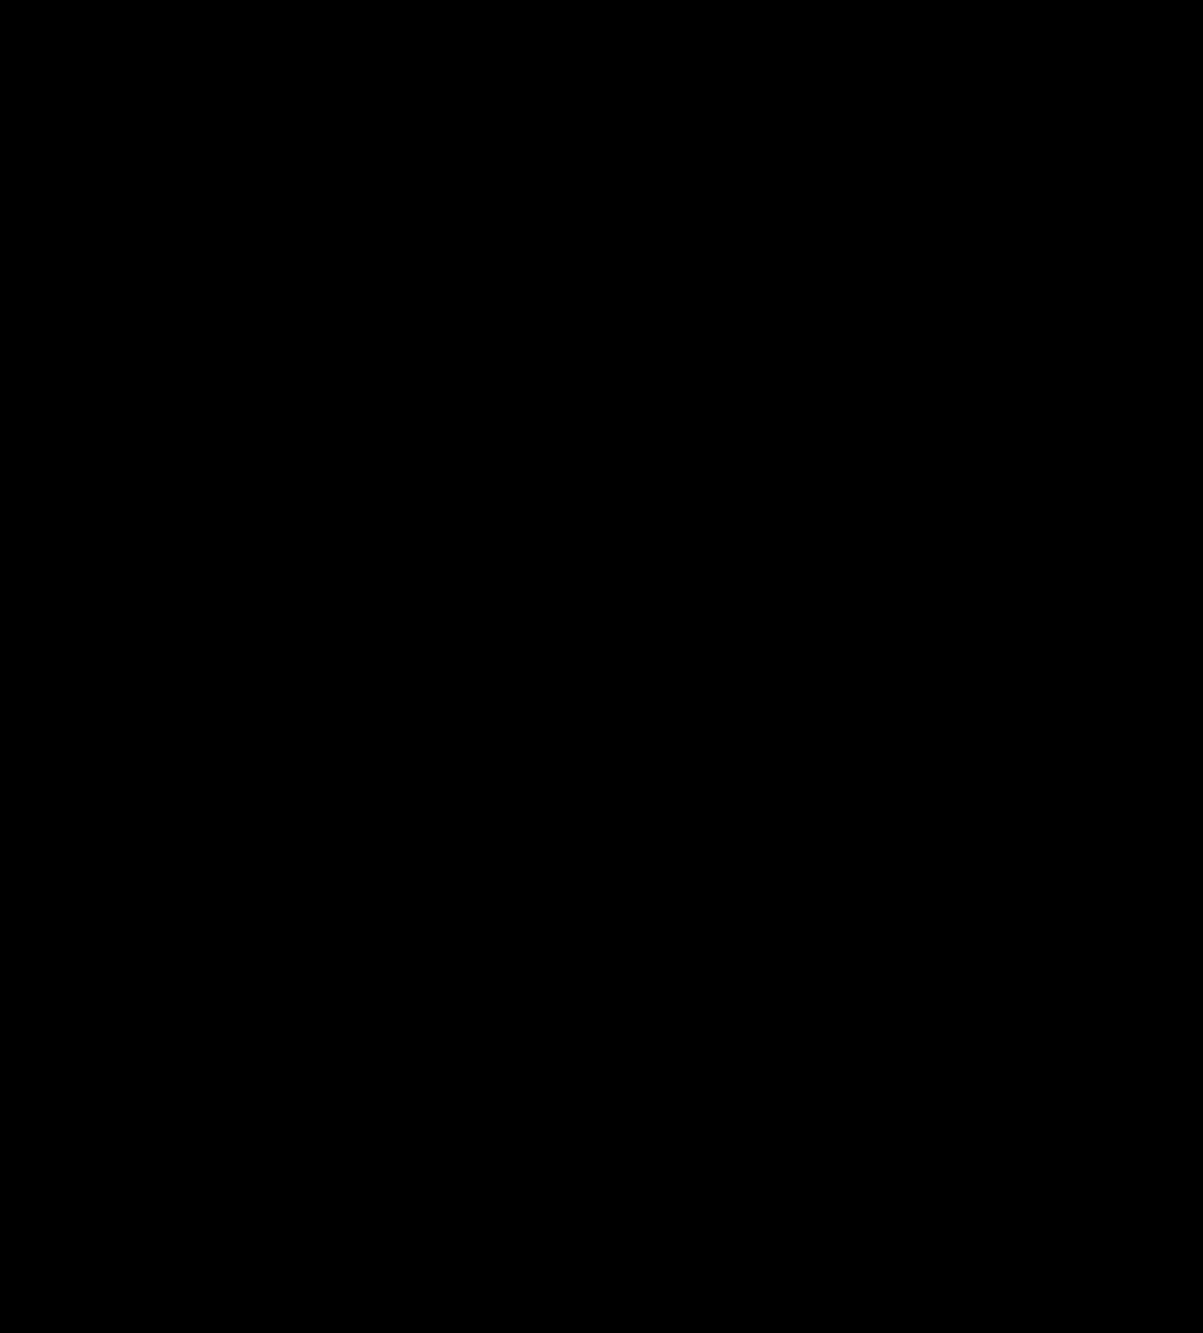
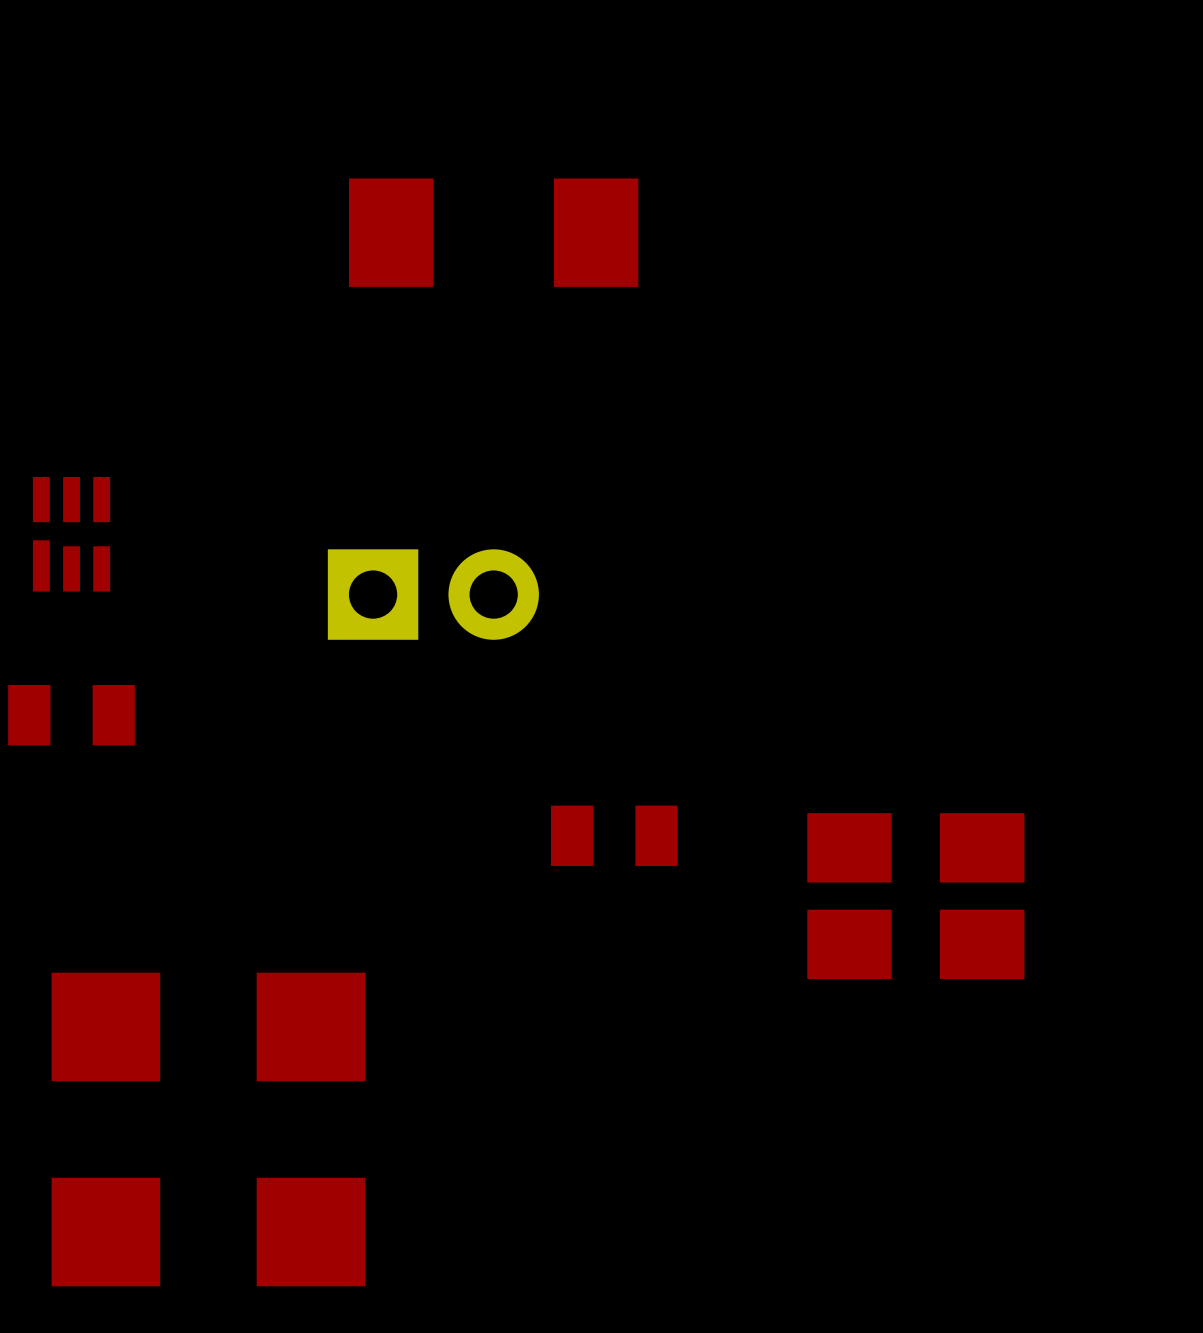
part: none -> (493, 232)
part: none -> (71, 534)
part: none -> (433, 594)
part: none -> (71, 715)
part: none -> (614, 835)
part: none -> (915, 896)
part: none -> (208, 1129)

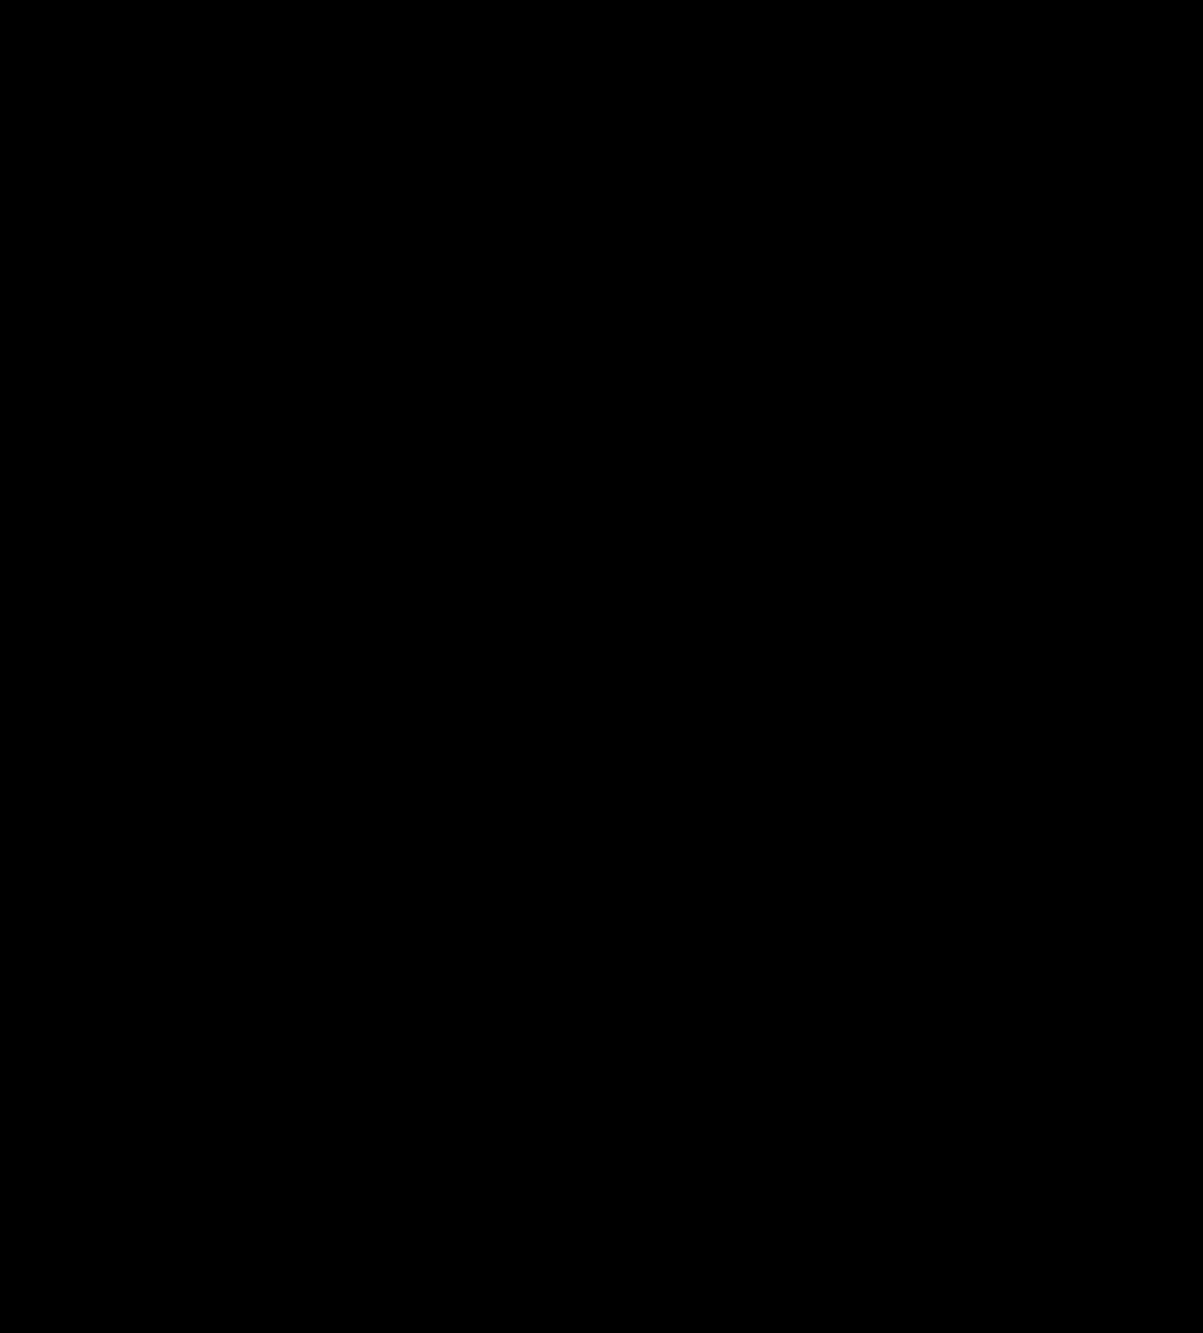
part: (493, 232) -> none
part: (71, 534) -> none
part: (433, 594) -> none
part: (71, 715) -> none
part: (614, 835) -> none
part: (915, 896) -> none
part: (208, 1129) -> none

